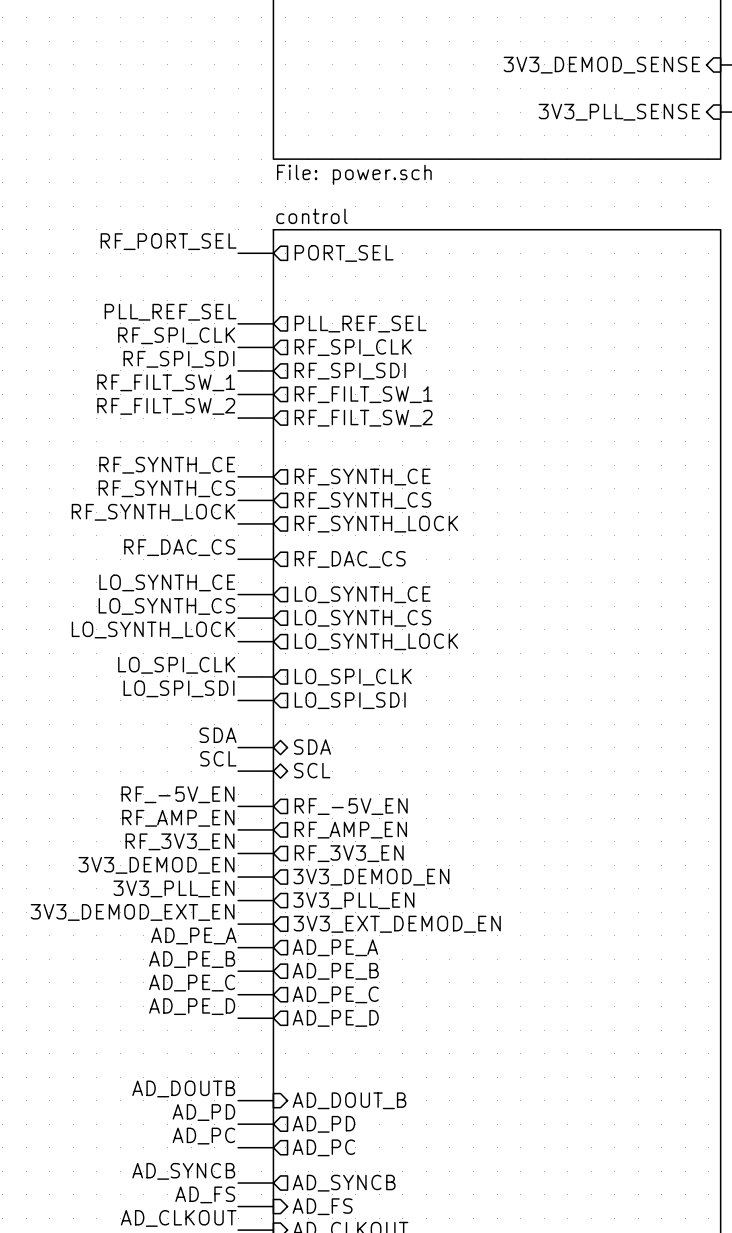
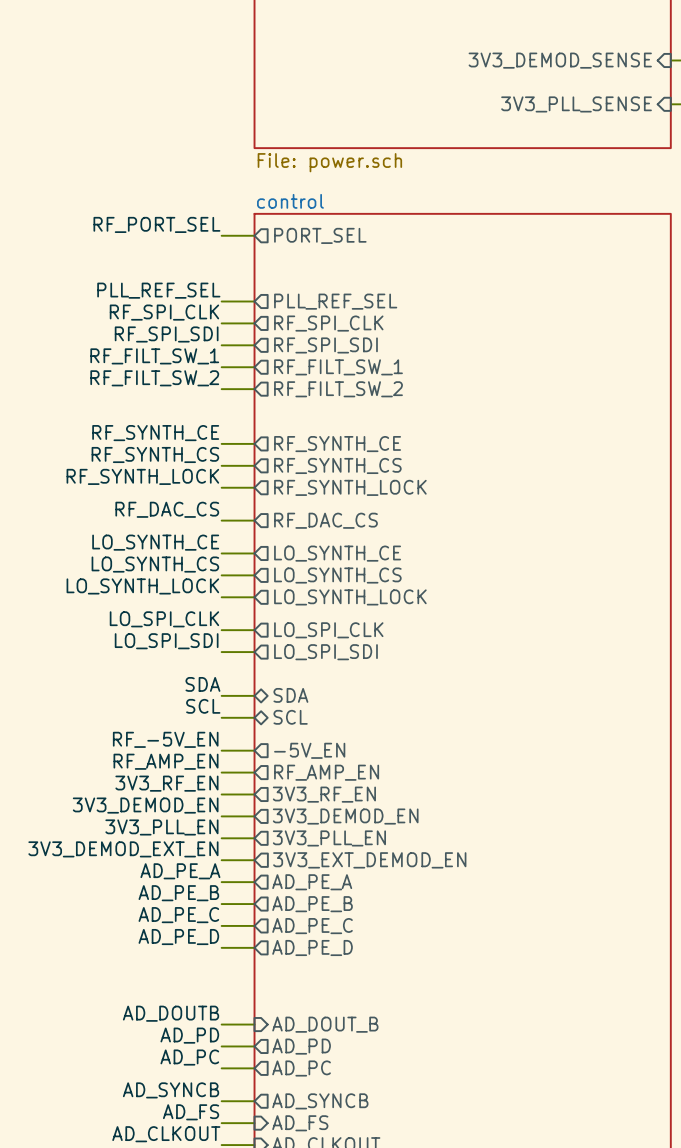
sheet pin: RF_-5V_EN (351, 806) -> -5V_EN (309, 750)
label: RF_3V3_EN (180, 841) -> 3V3_RF_EN (166, 783)
sheet pin: RF_3V3_EN (349, 853) -> 3V3_RF_EN (324, 794)

